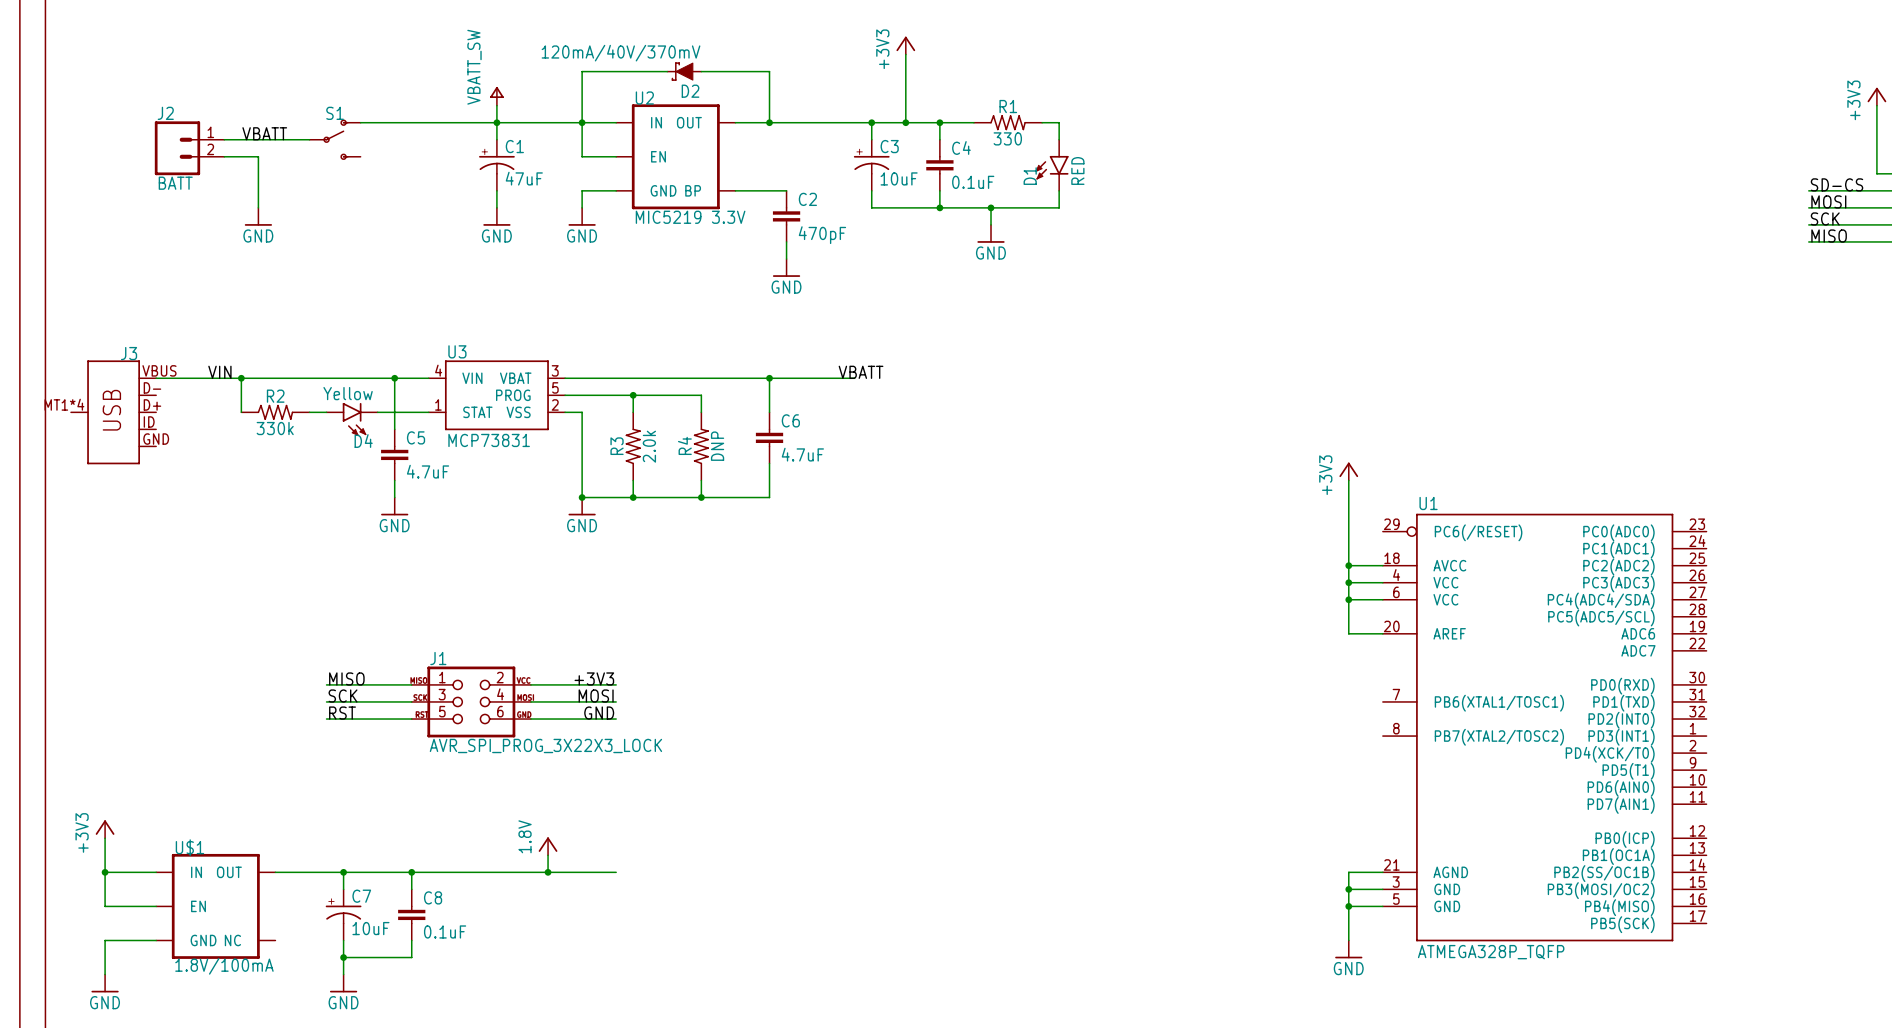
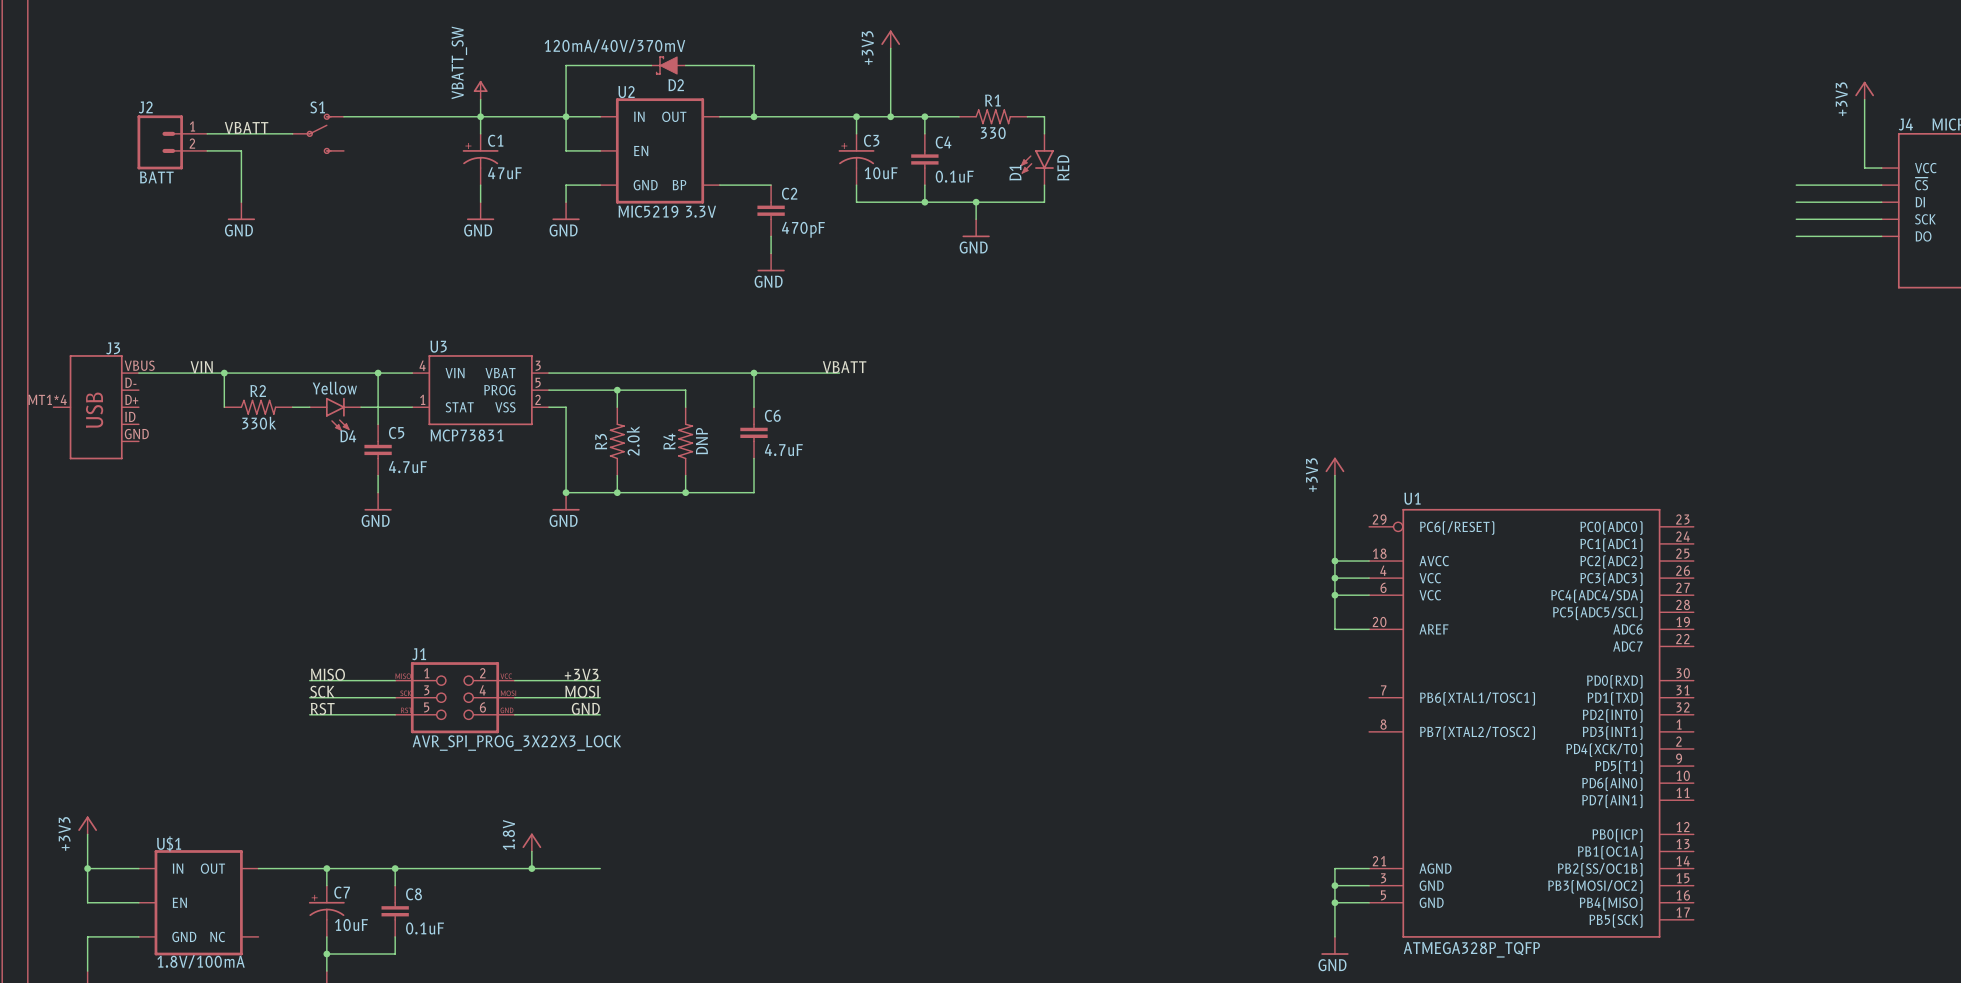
label: SD-CS (1837, 184) -> none
label: MOSI (1828, 201) -> none
label: SCK (1825, 218) -> none
label: MISO (1829, 236) -> none

